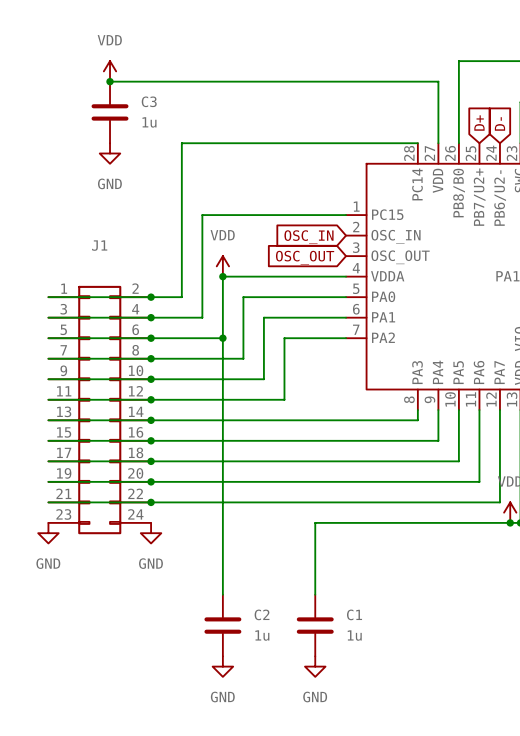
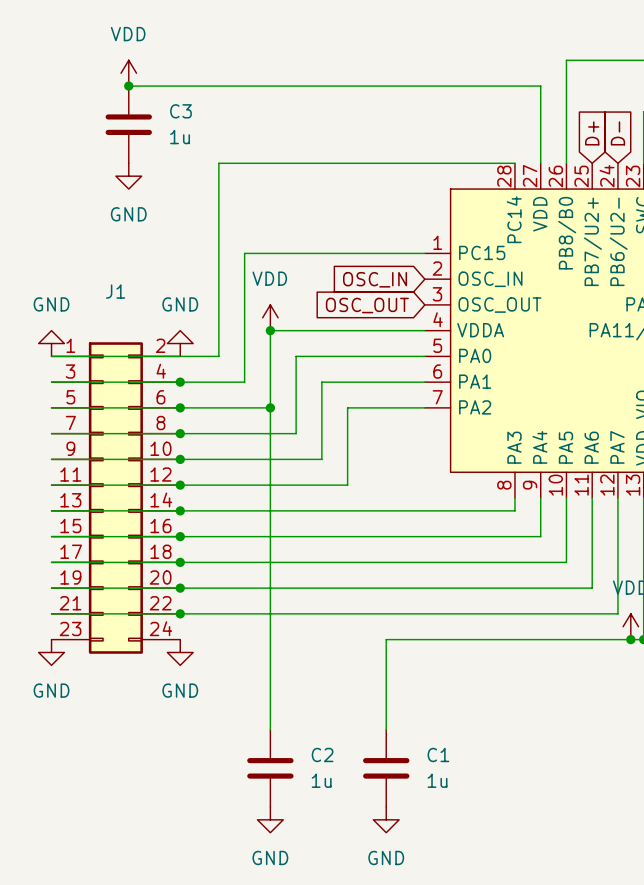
power symbol: none -> GND (51, 343)
power symbol: none -> GND (180, 343)
junction: (151, 297) -> none

